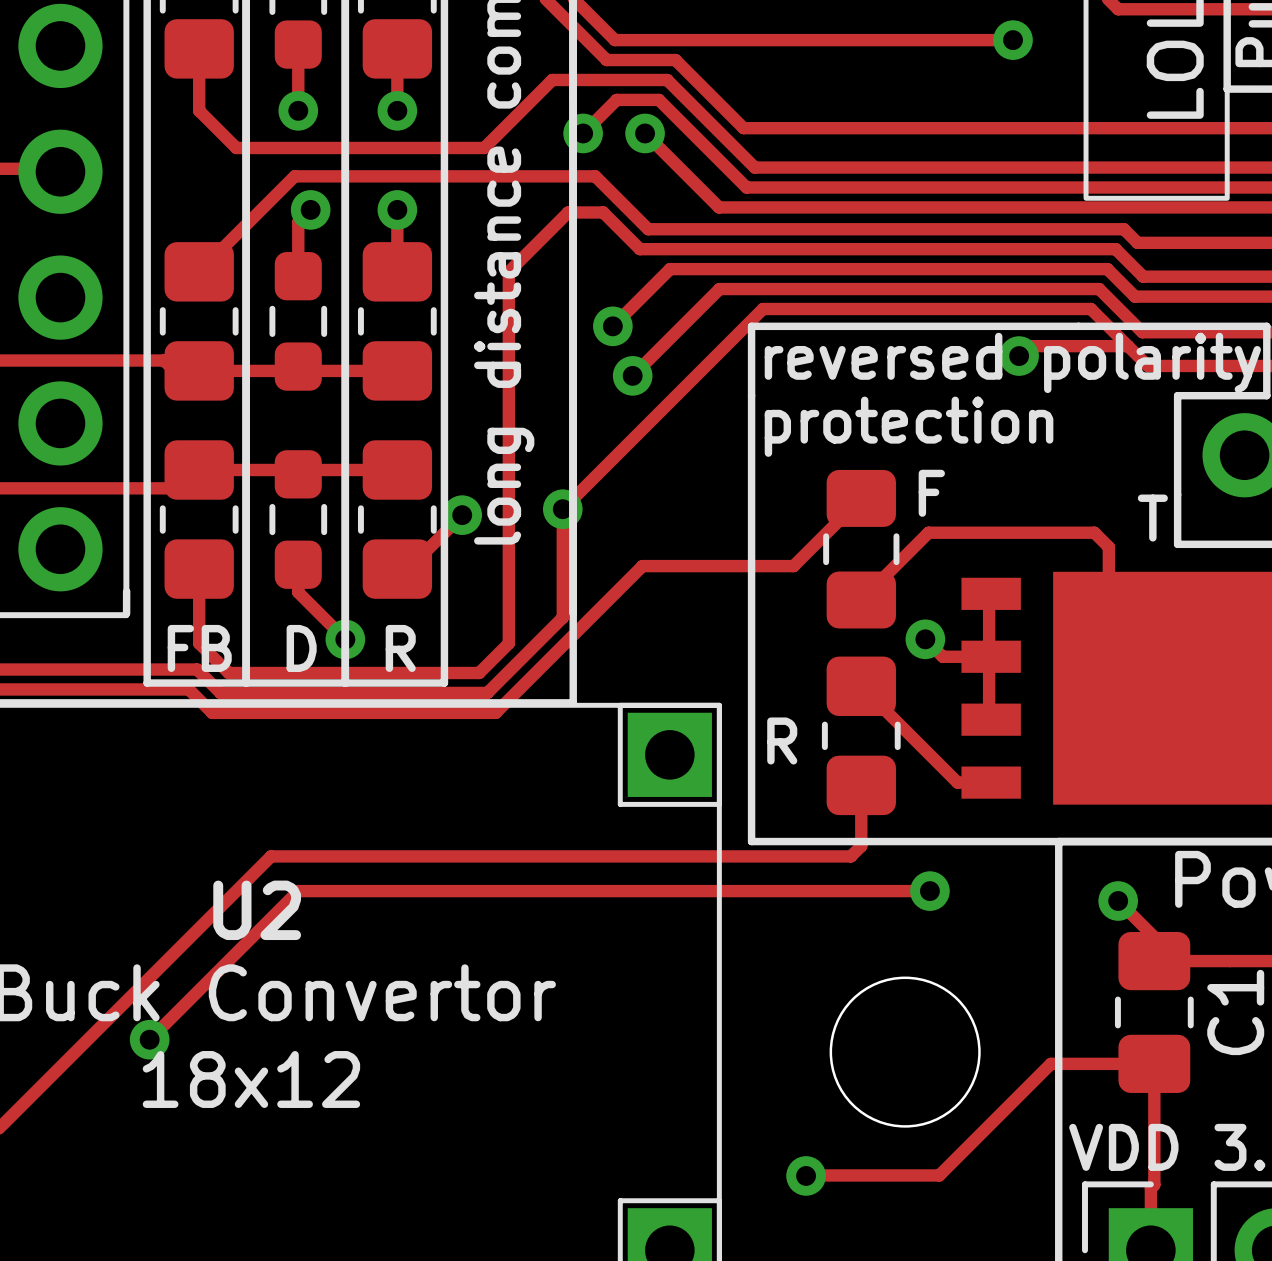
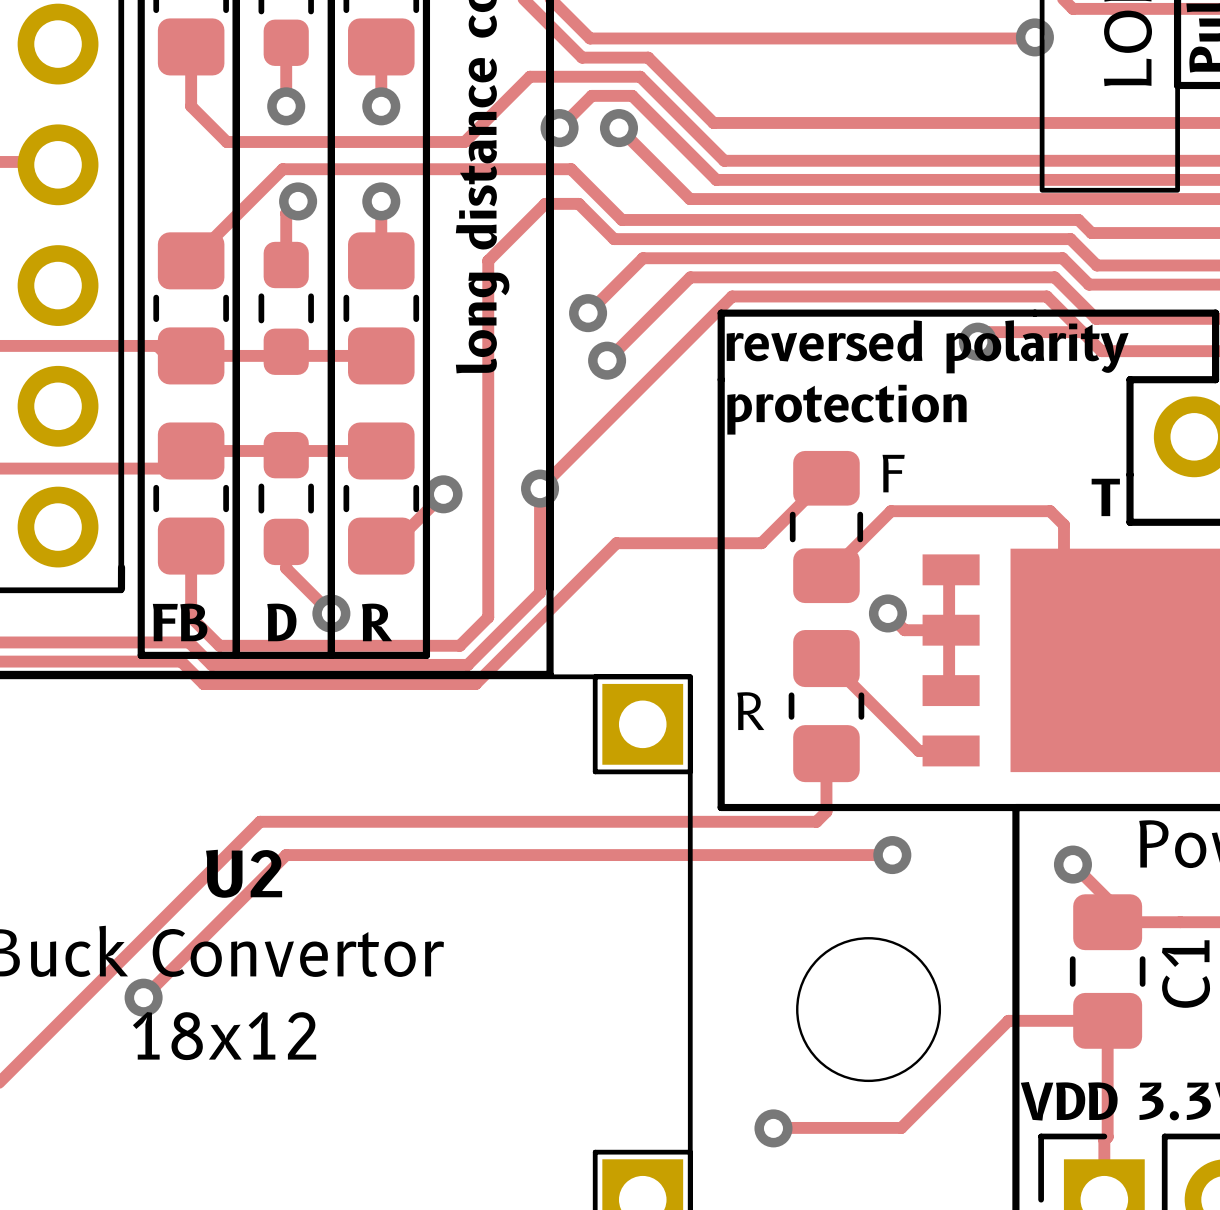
track: none -> (1034, 37) (1036, 38) (972, 38)
via: none -> (1034, 37)
via: (1013, 40) -> none

